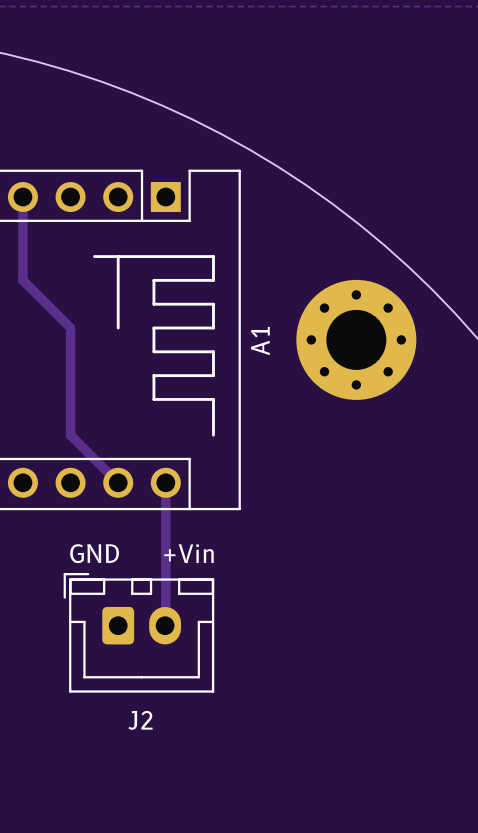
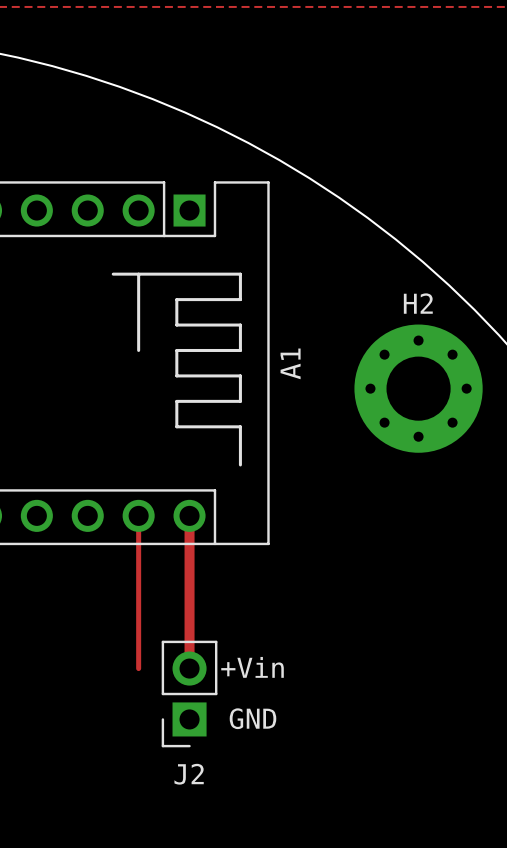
track: (22, 197) (22, 280) (70, 328) (70, 435) (118, 482) -> (138, 668) (138, 515)
part: (356, 339) -> none
H2: none -> (418, 388)
text position: GND (94, 553) -> GND (252, 718)
text position: +Vin (189, 553) -> +Vin (252, 667)
J2 footprint: [63, 572, 215, 693] -> [161, 640, 218, 748]

